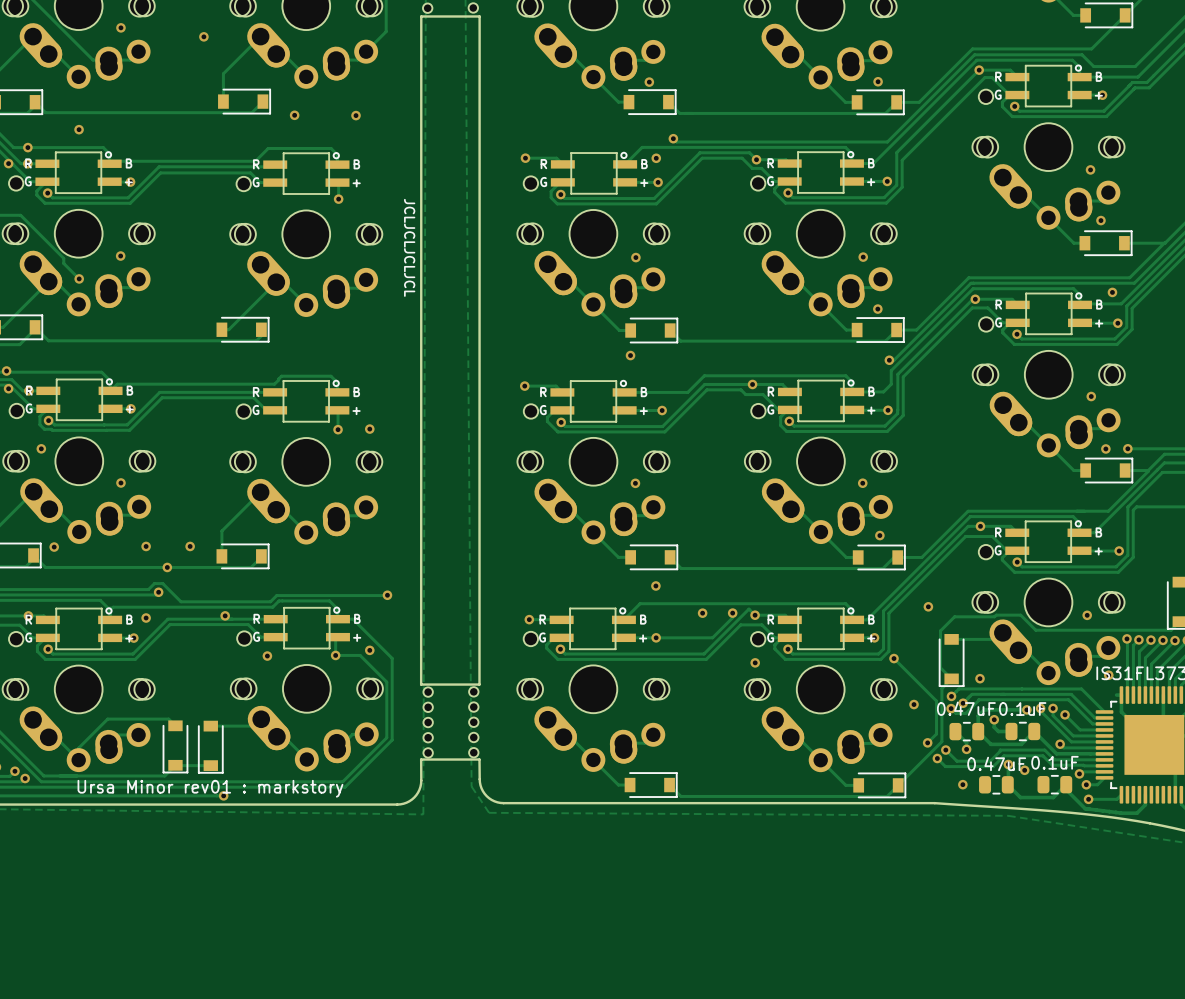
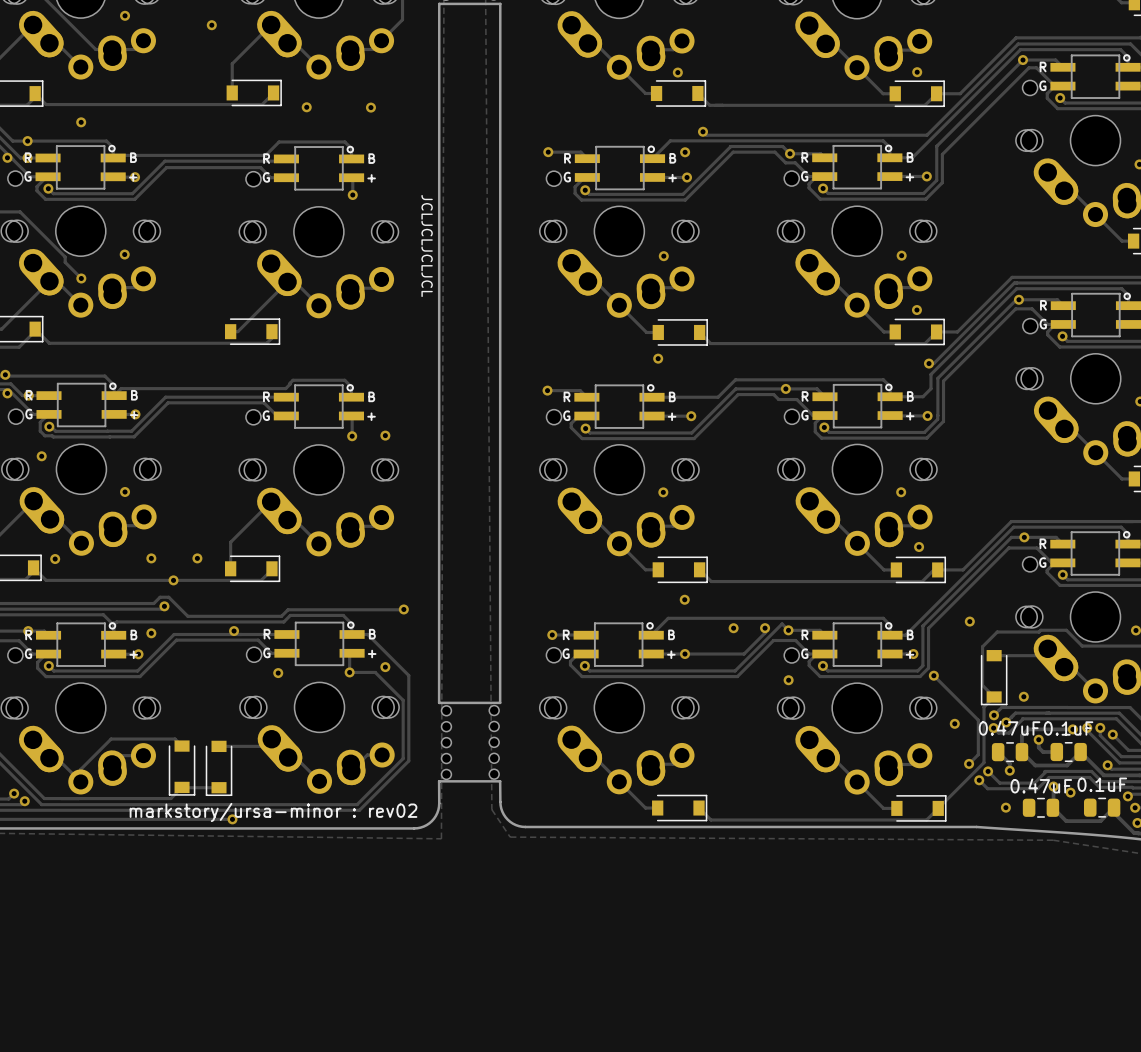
text: Ursa Minor rev01 : markstory (210, 788) -> none
text: none -> markstory/ursa-minor : rev02 (273, 812)

